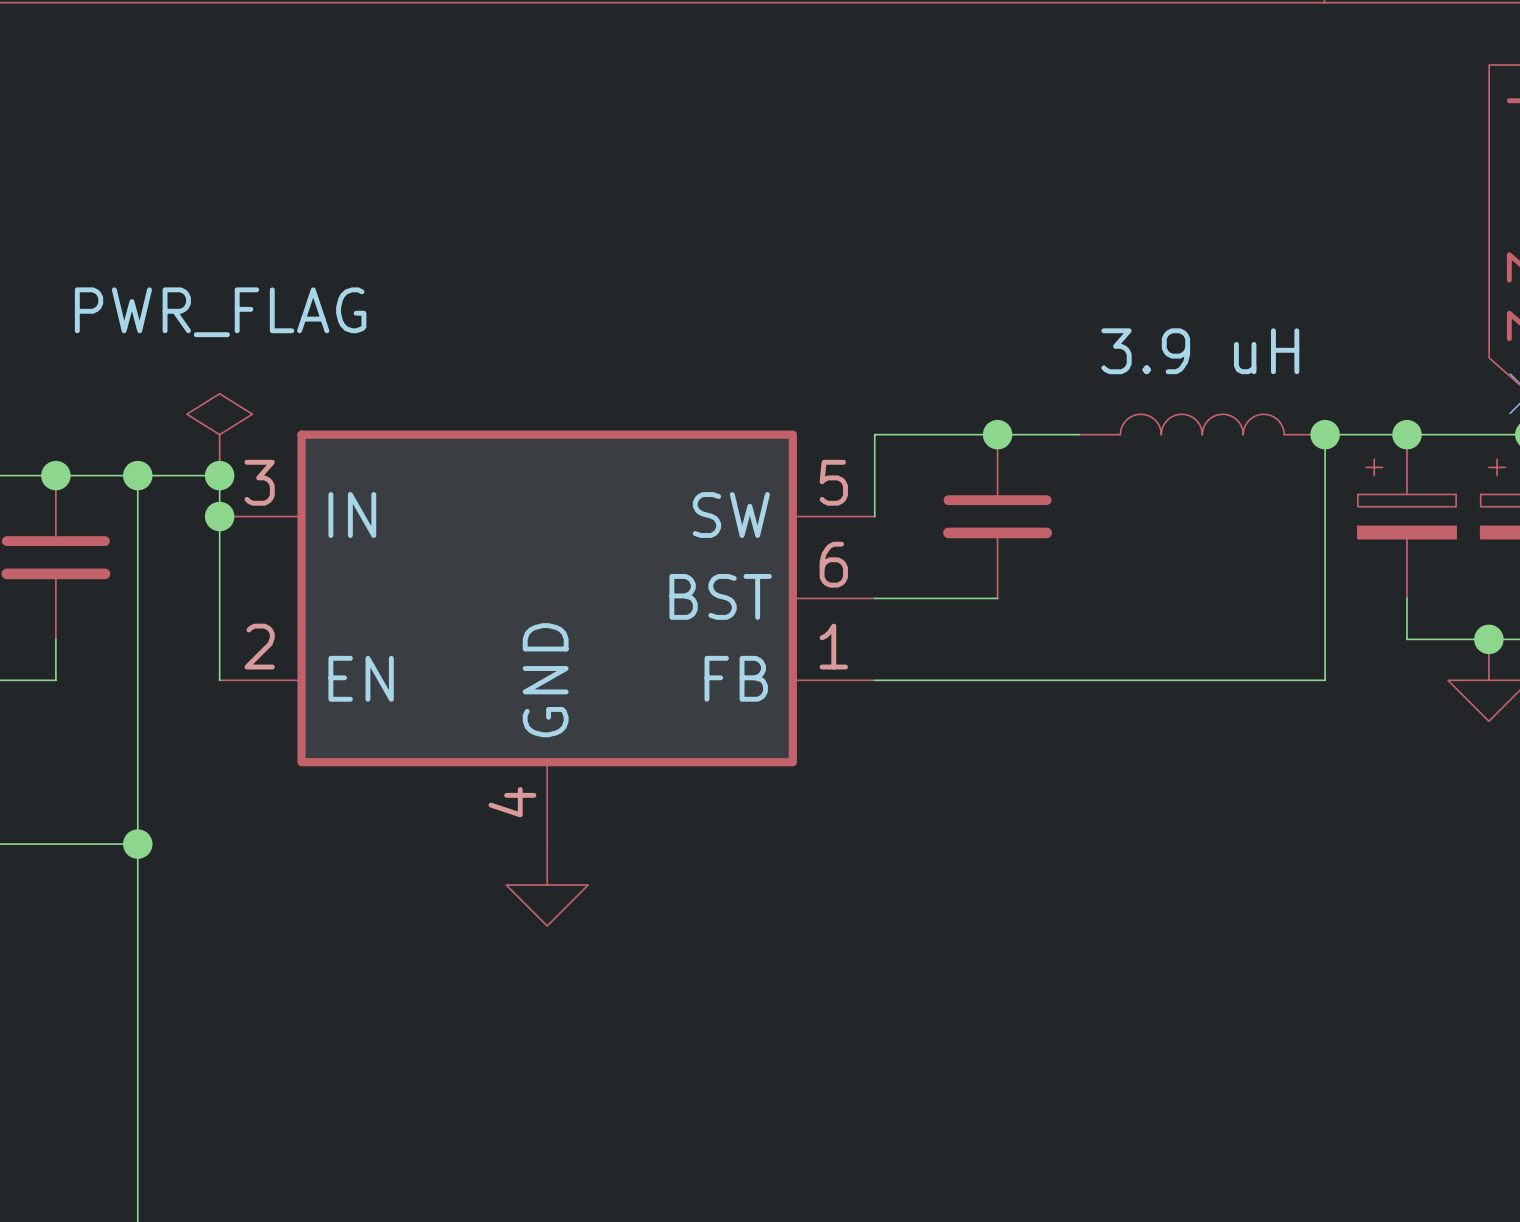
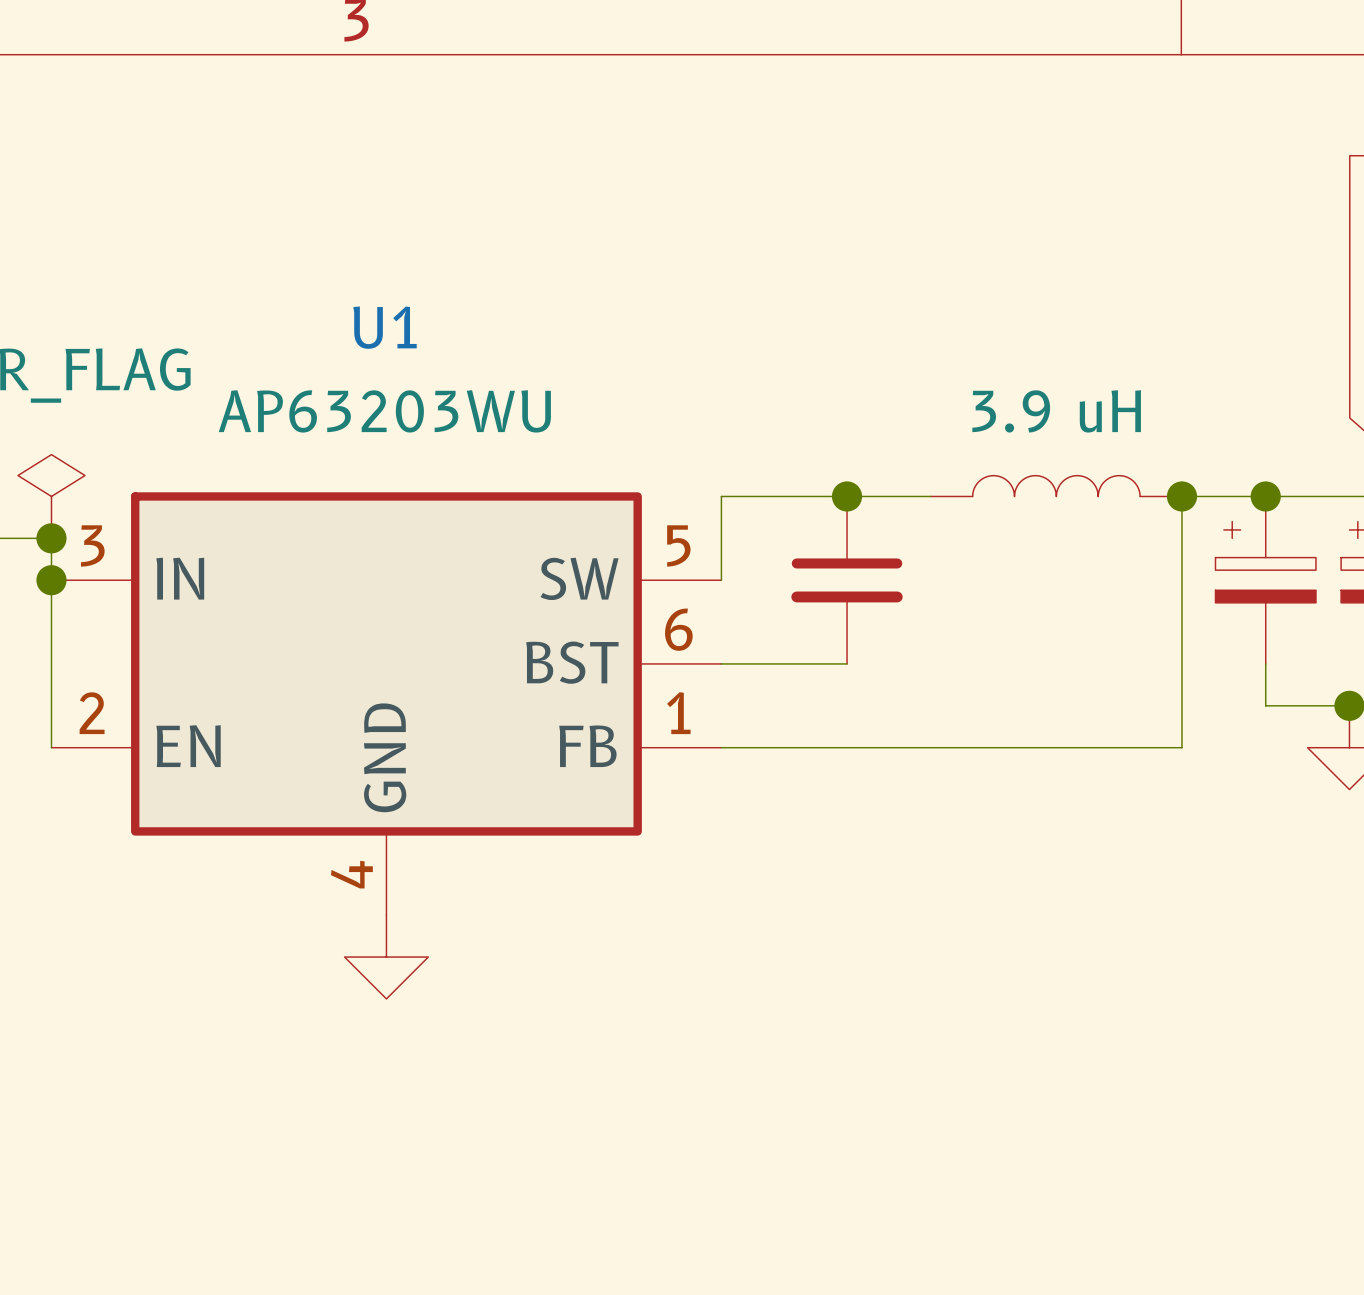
U1 name: none -> U1 (385, 327)
U1 value: none -> AP63203WU (384, 411)

